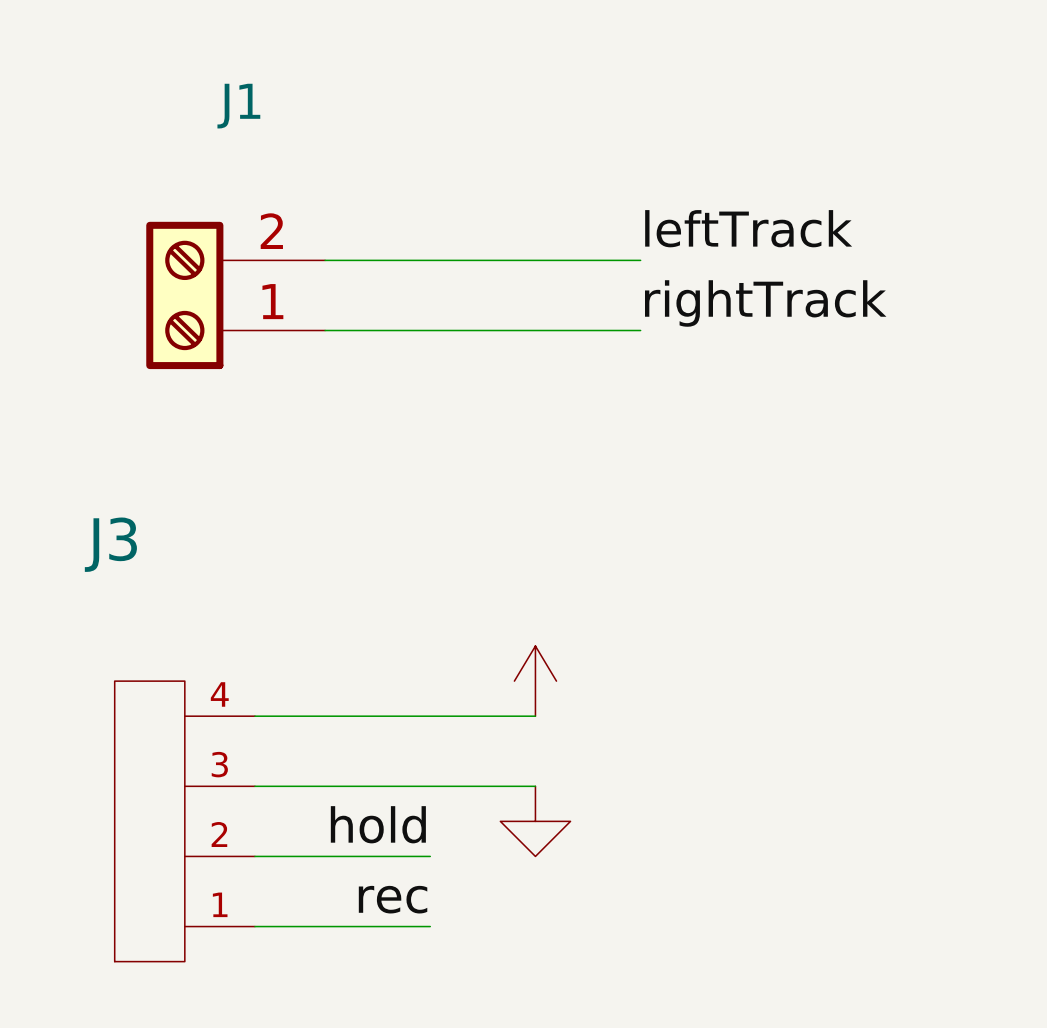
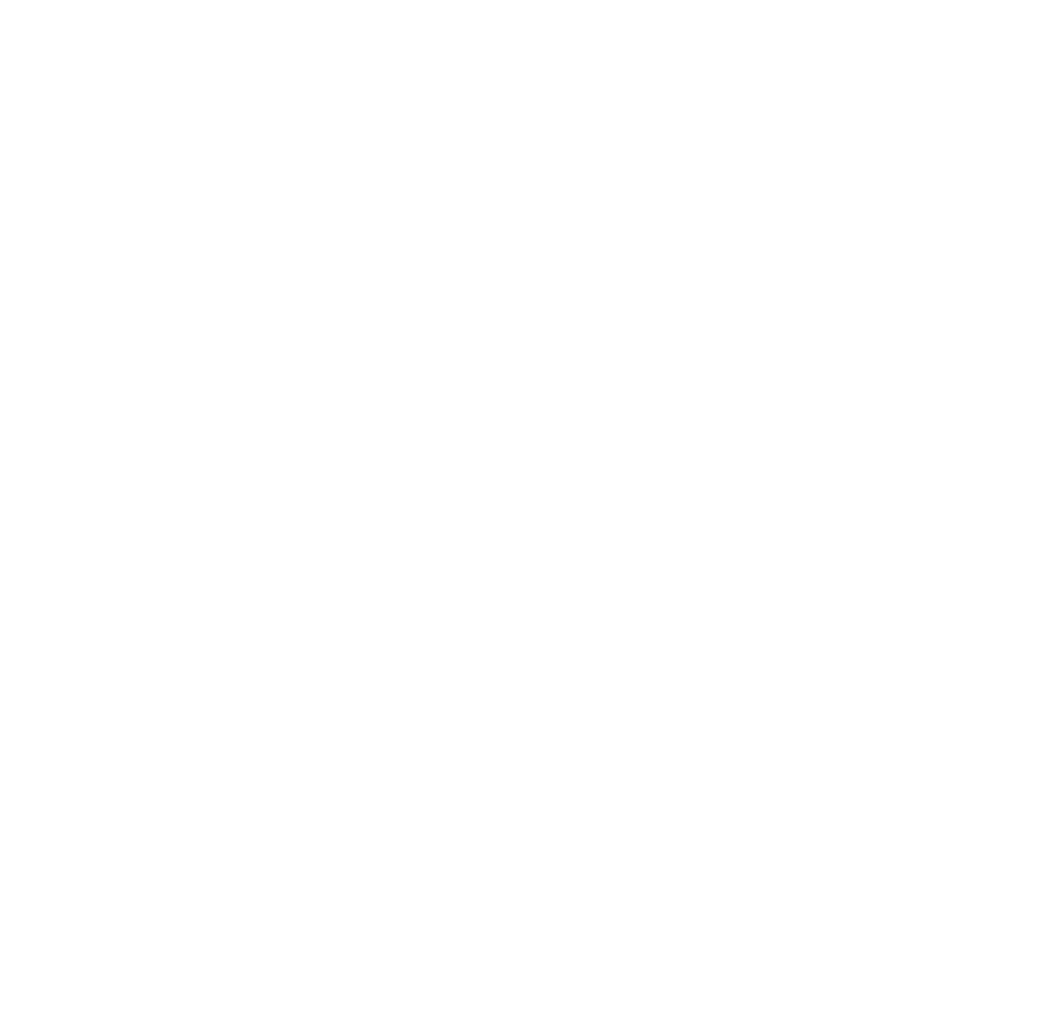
label: leftTrack (748, 228) -> none
wire: (325, 260) (640, 260) -> none
J1: (235, 295) -> none
label: rightTrack (765, 303) -> none
wire: (325, 330) (640, 330) -> none
power symbol: (535, 681) -> none
wire: (254, 716) (535, 716) -> none
wire: (254, 786) (535, 786) -> none
J3: (184, 821) -> none
power symbol: (535, 821) -> none
label: hold (378, 824) -> none
wire: (254, 856) (430, 856) -> none
label: rec (393, 899) -> none
wire: (254, 926) (430, 926) -> none

